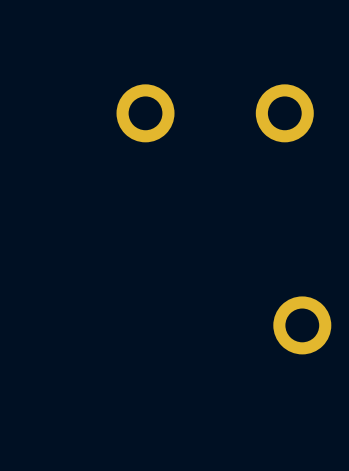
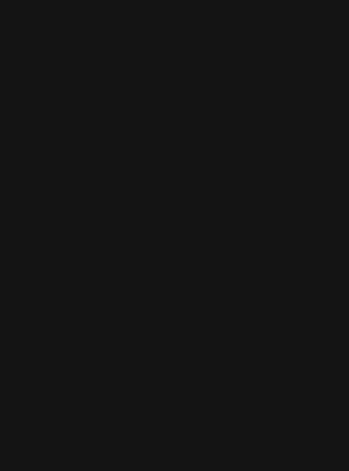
part: (145, 113) -> none
part: (284, 113) -> none
part: (302, 325) -> none

